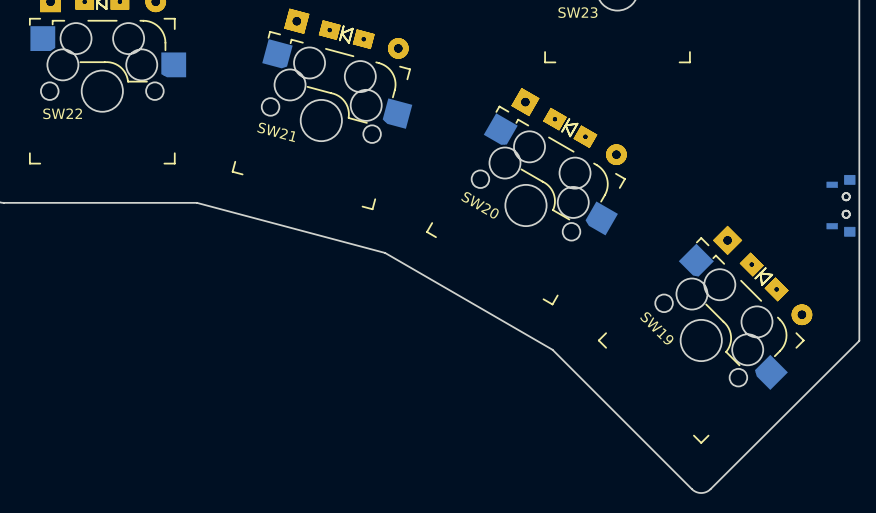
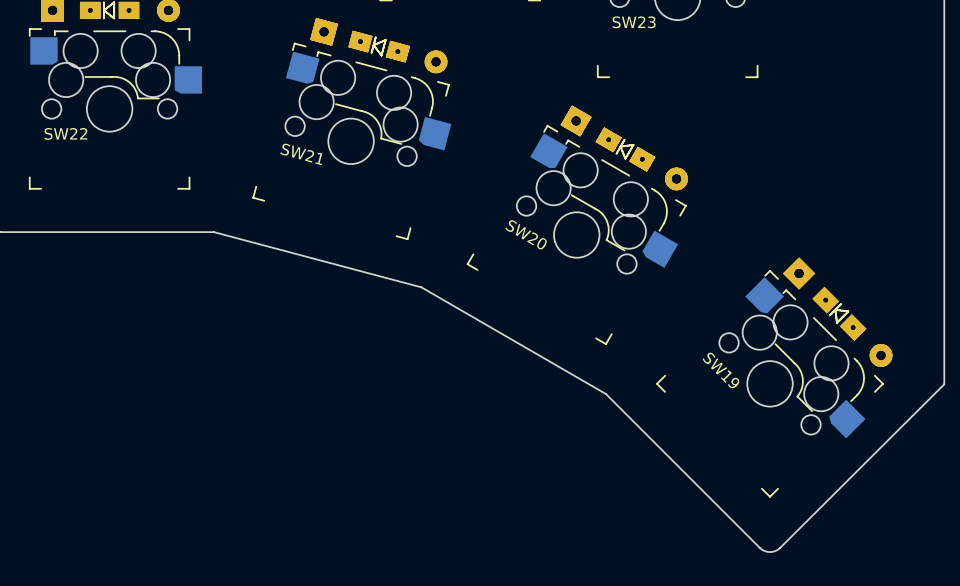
part: (841, 205) -> none
part: (846, 205) -> none

